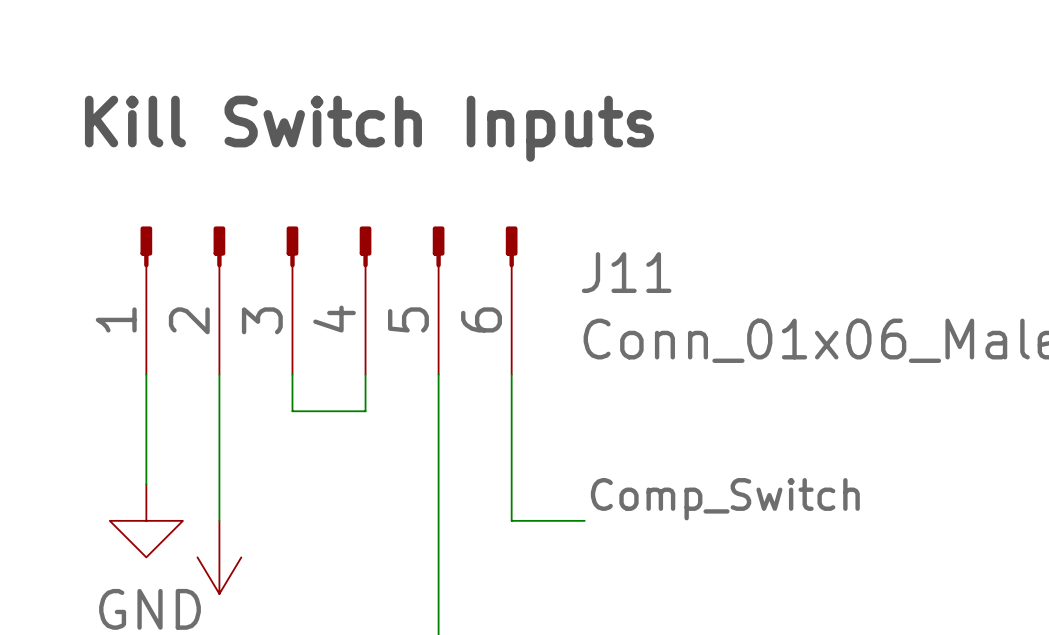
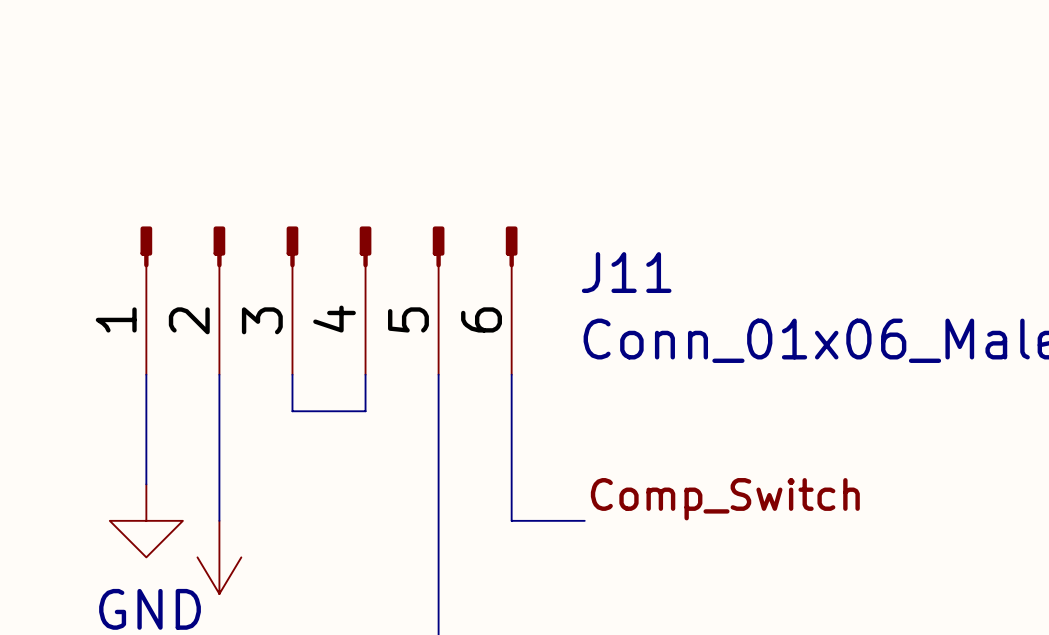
text: Kill Switch Inputs (369, 128) -> none

